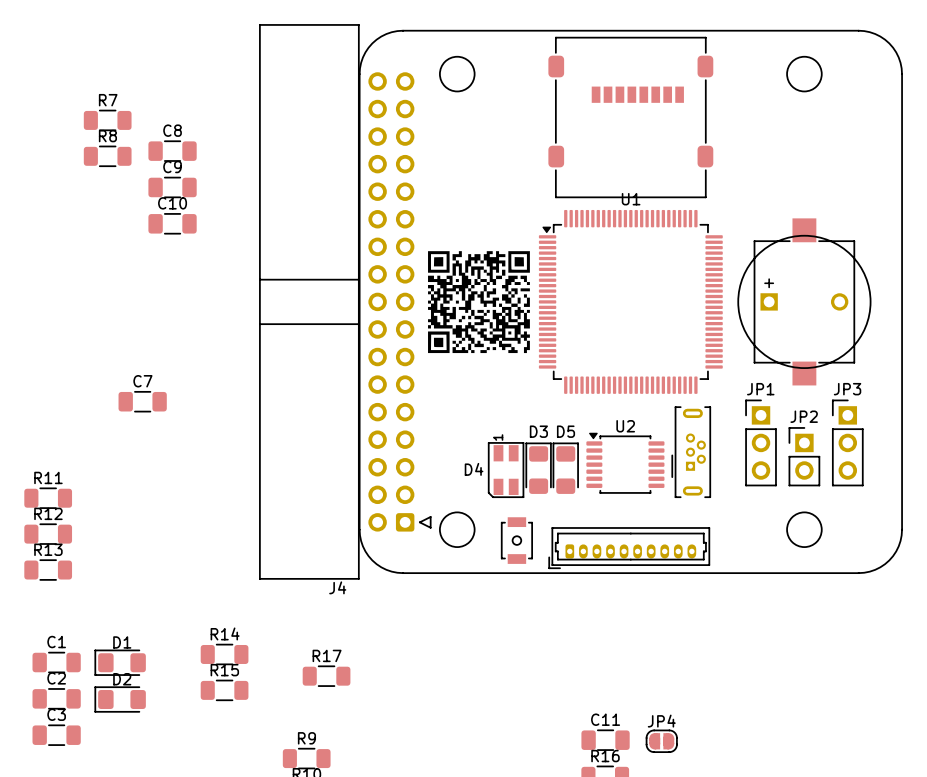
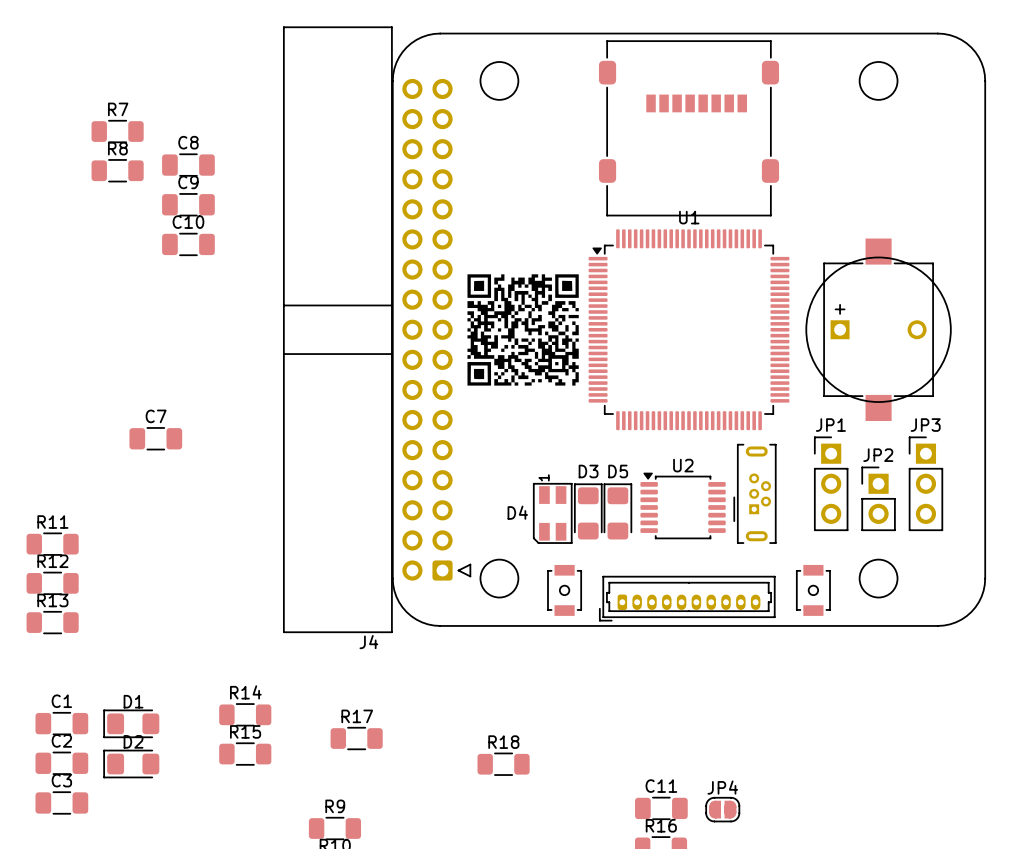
part: none -> (813, 590)
R18: none -> (503, 764)

